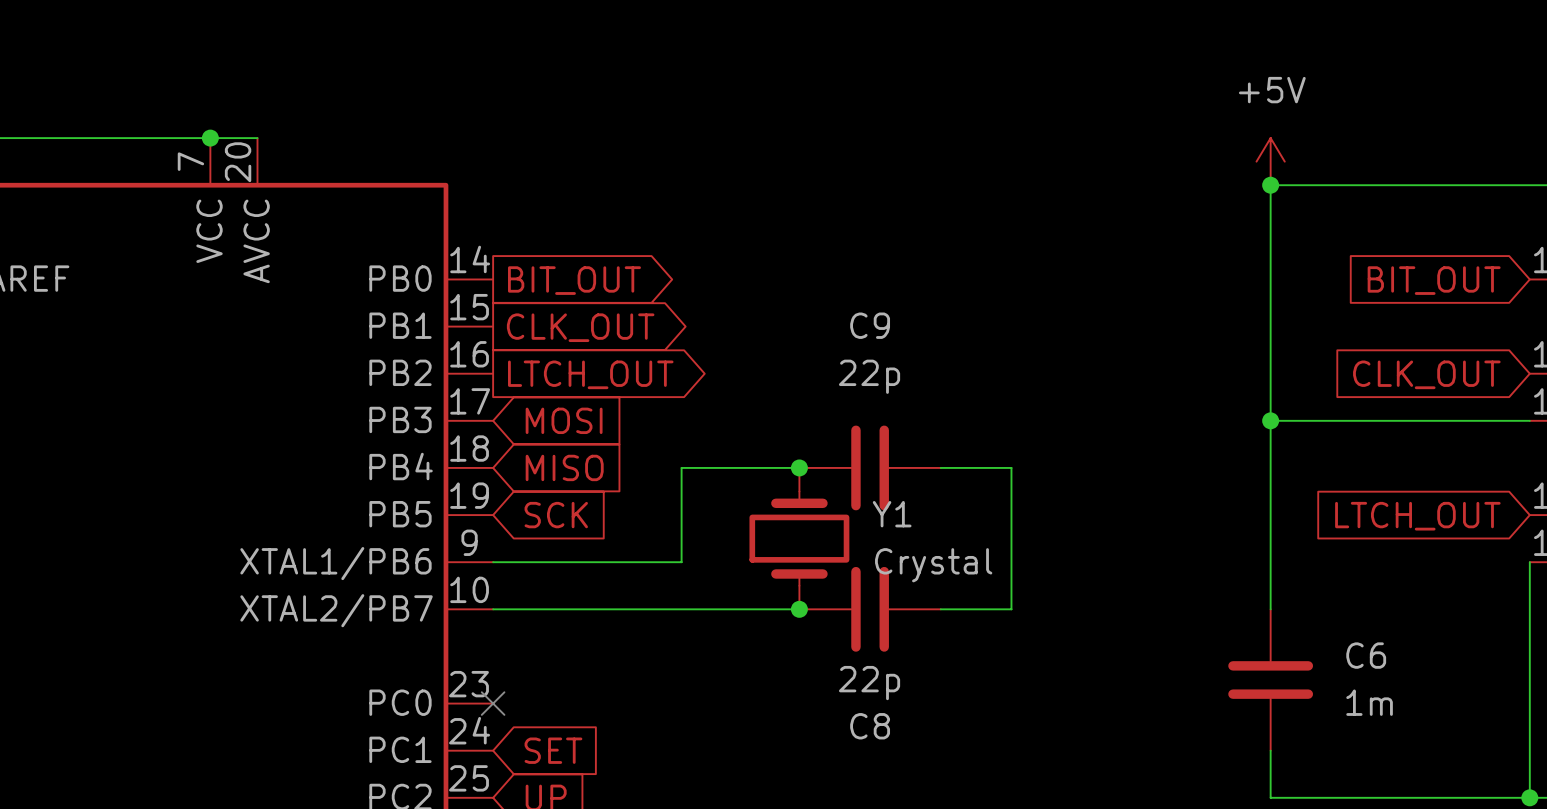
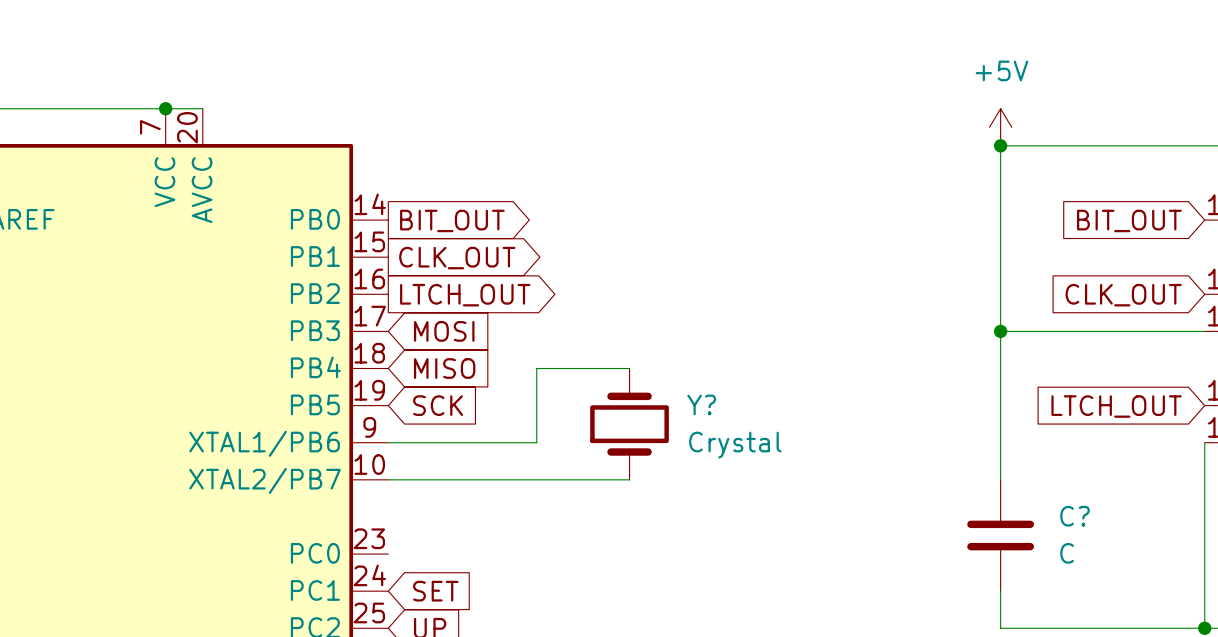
junction: (799, 467) -> none
C9: 22p (870, 467) -> none
wire: (940, 467) (1011, 467) (1011, 609) (940, 609) -> none
Y1 name: Y1 (892, 514) -> Y? (701, 404)
junction: (799, 609) -> none
C8: 22p (870, 609) -> none
C6 name: C6 (1366, 655) -> C? (1074, 516)
C6 value: 1m (1369, 702) -> C (1067, 553)
no-connect mark: (493, 703) -> none

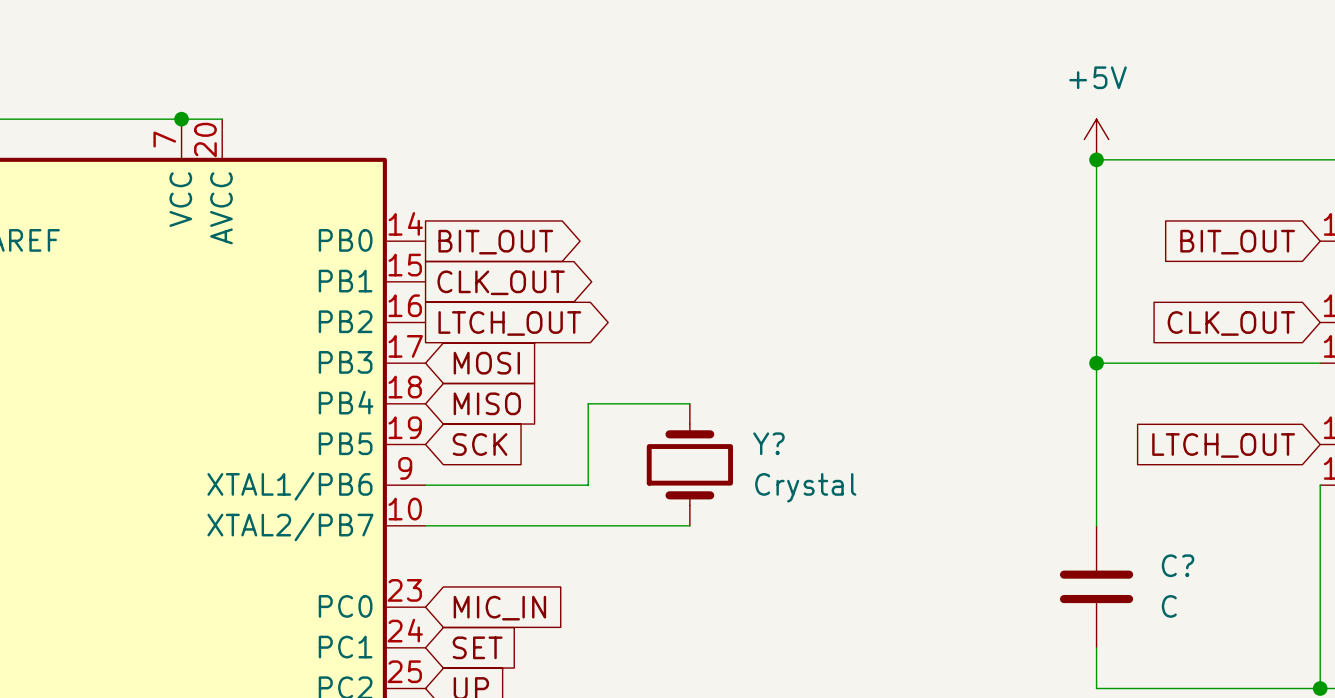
global label: none -> MIC_IN (499, 608)

